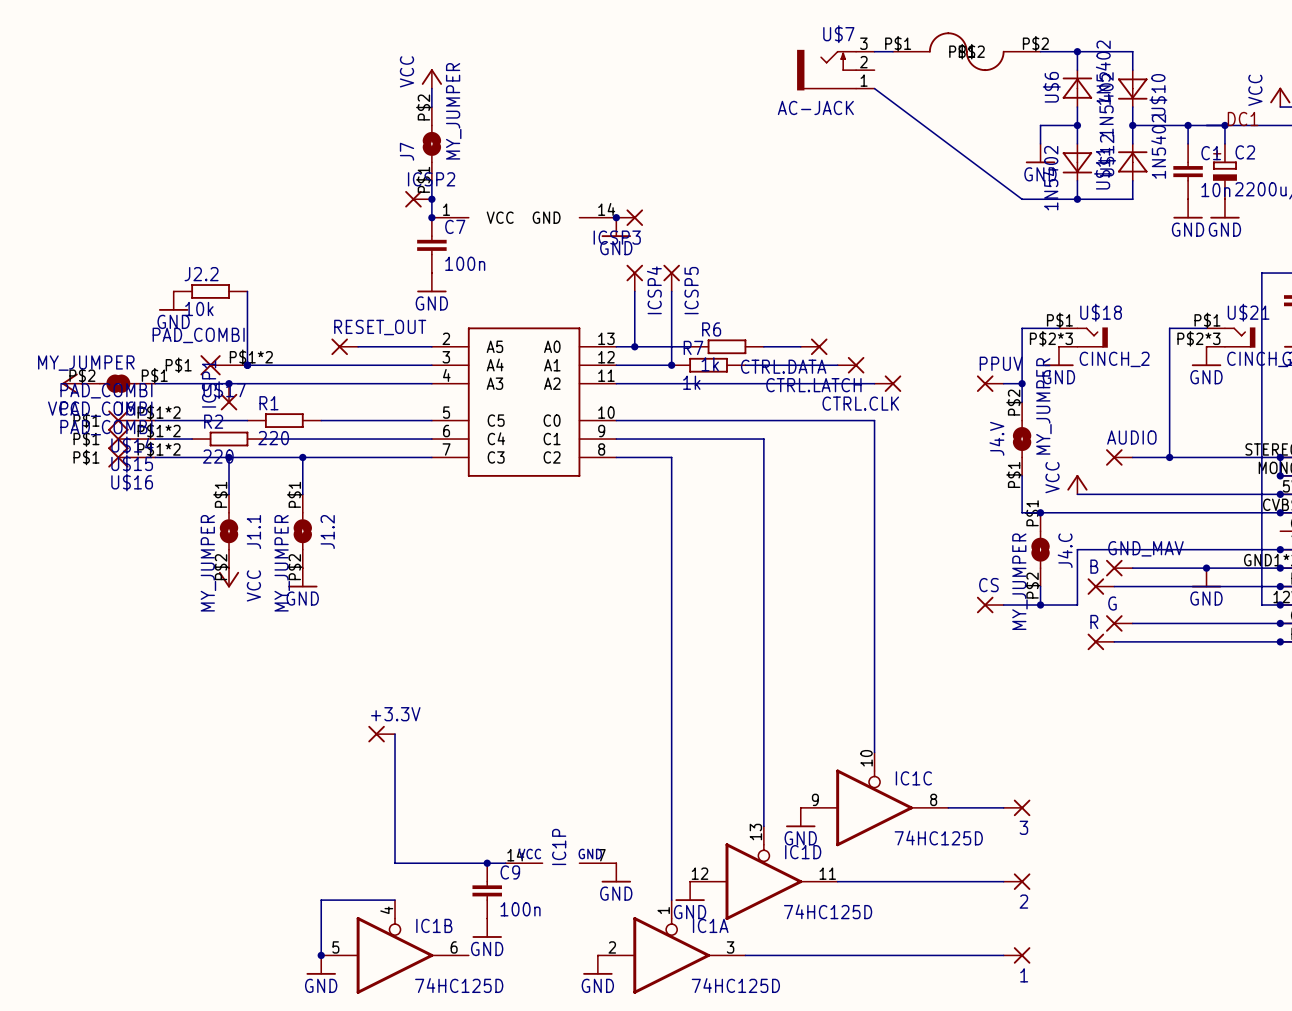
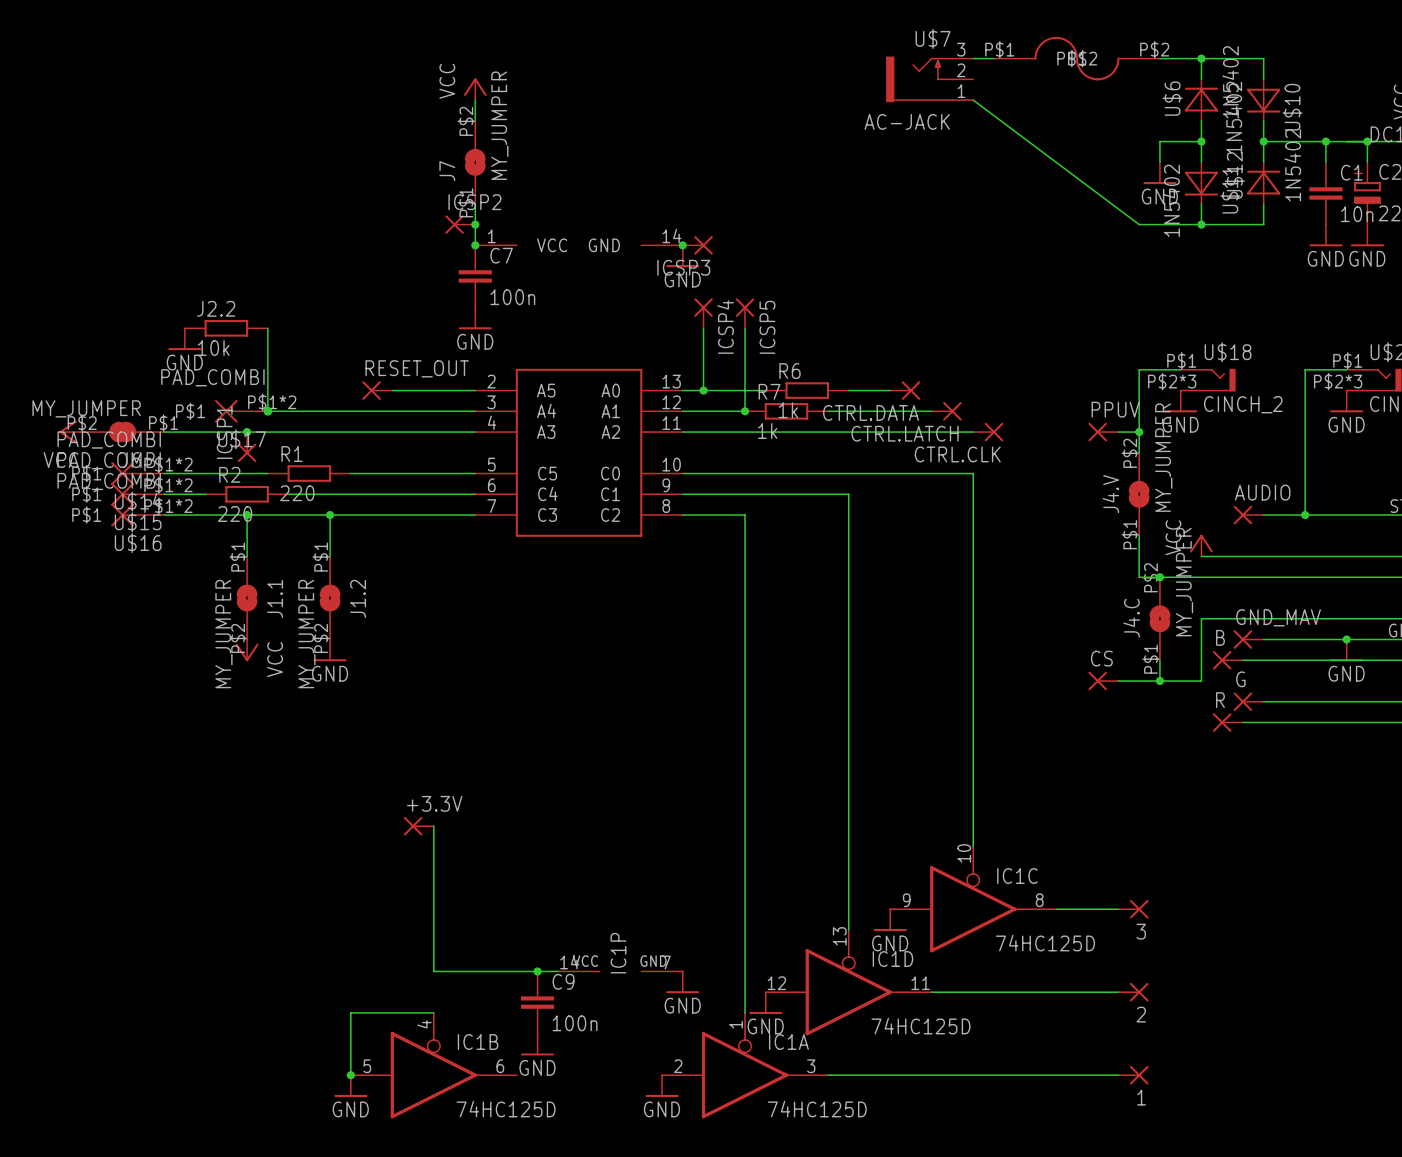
J4.C rotation: 0° (1040, 549) -> 180° (1159, 618)

